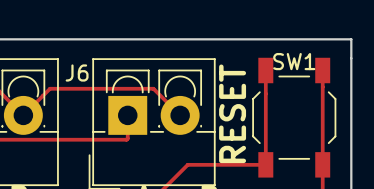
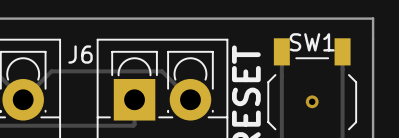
via: none -> (312, 101)

